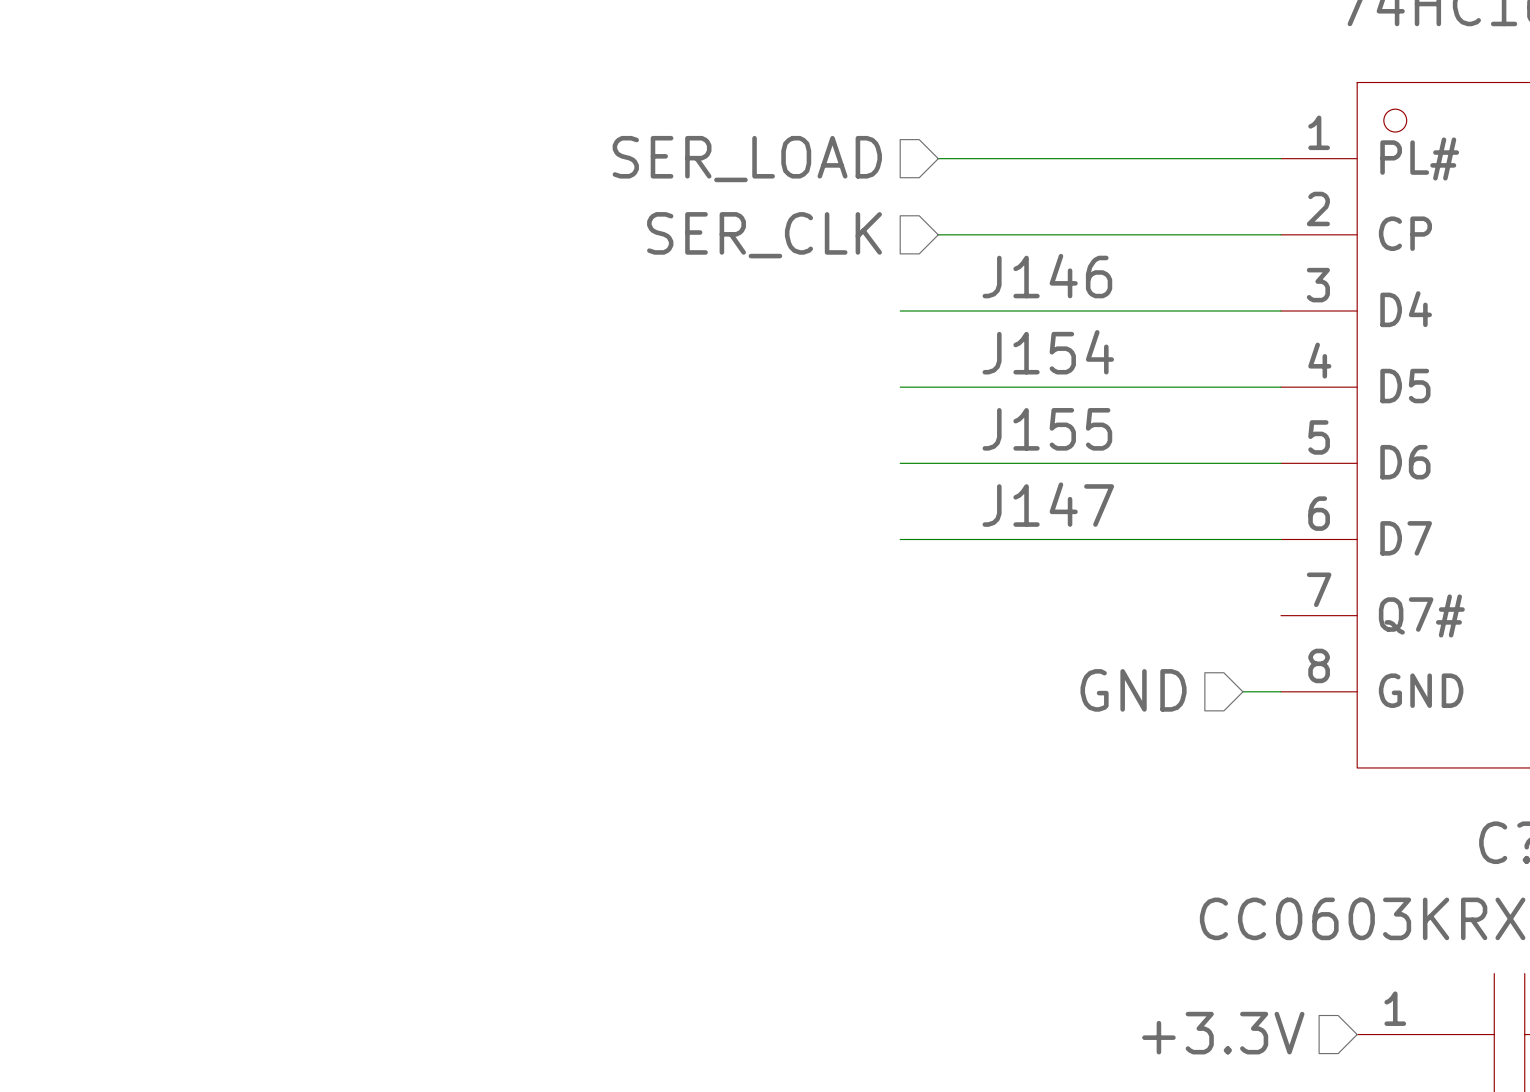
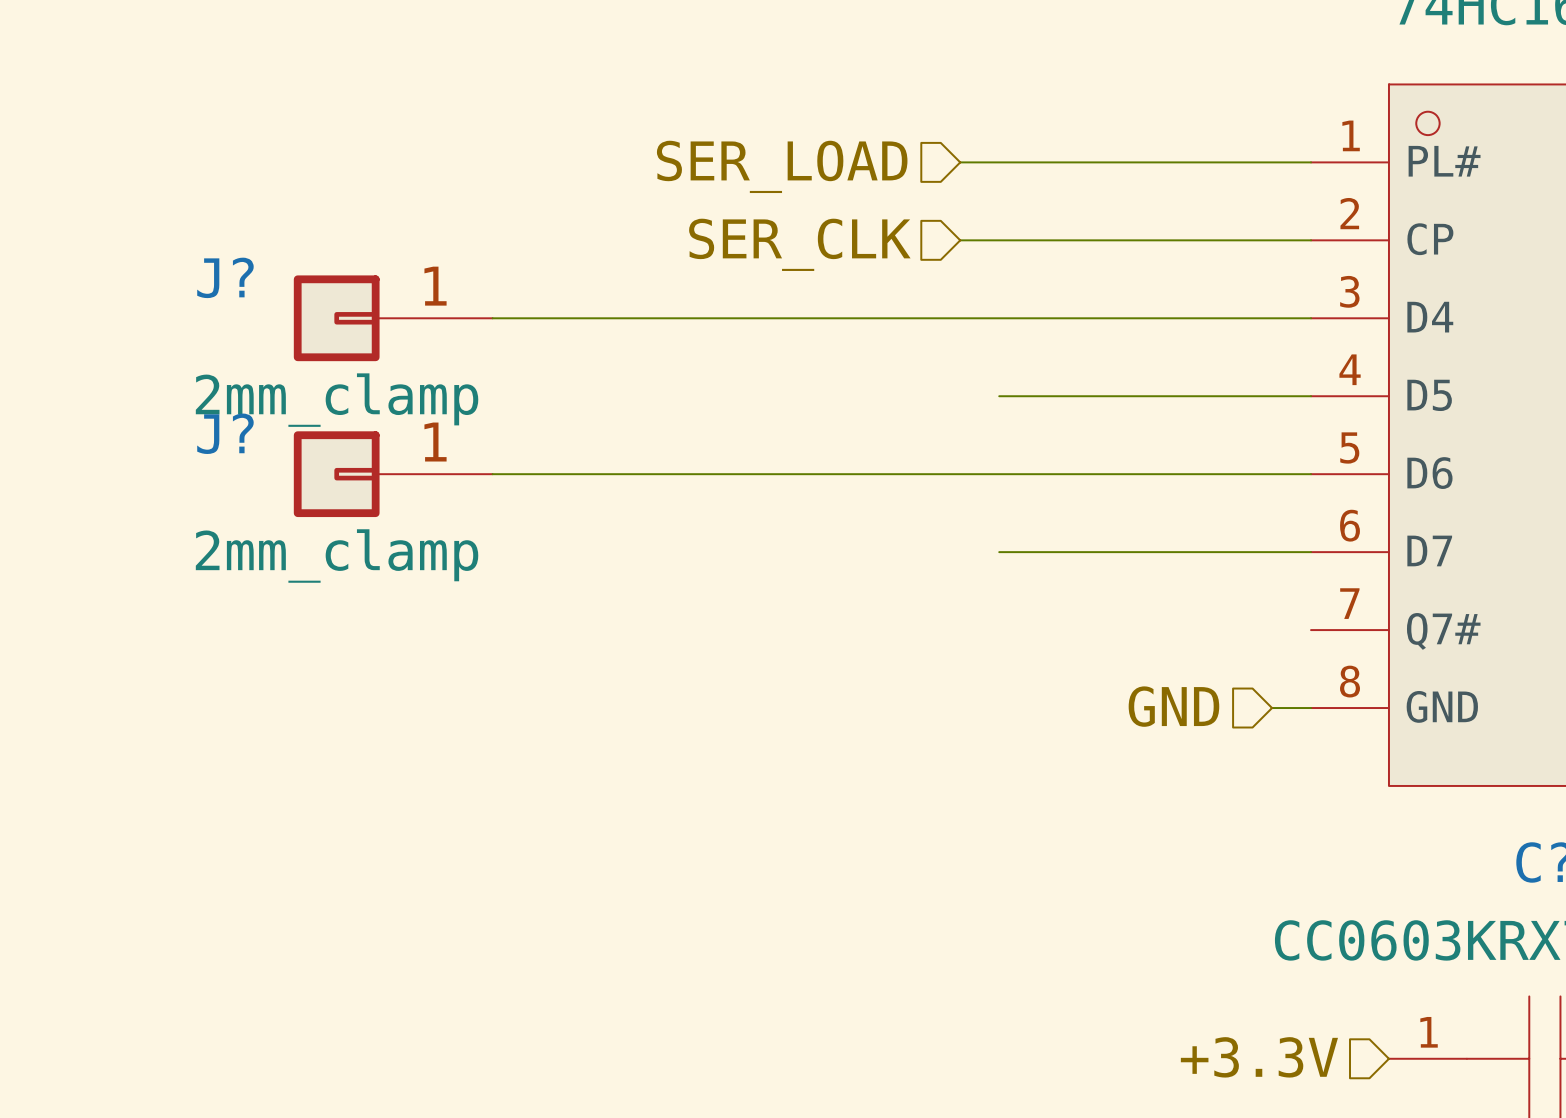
label: J146 (1047, 276) -> none
J?: none -> 2mm_clamp (393, 318)
wire: none -> (492, 318) (921, 318)
label: J154 (1048, 352) -> none
wire: (900, 387) (976, 387) -> none
label: J155 (1047, 429) -> none
J?: none -> 2mm_clamp (393, 474)
wire: none -> (492, 474) (921, 474)
label: J147 (1048, 504) -> none
wire: (900, 539) (976, 539) -> none

